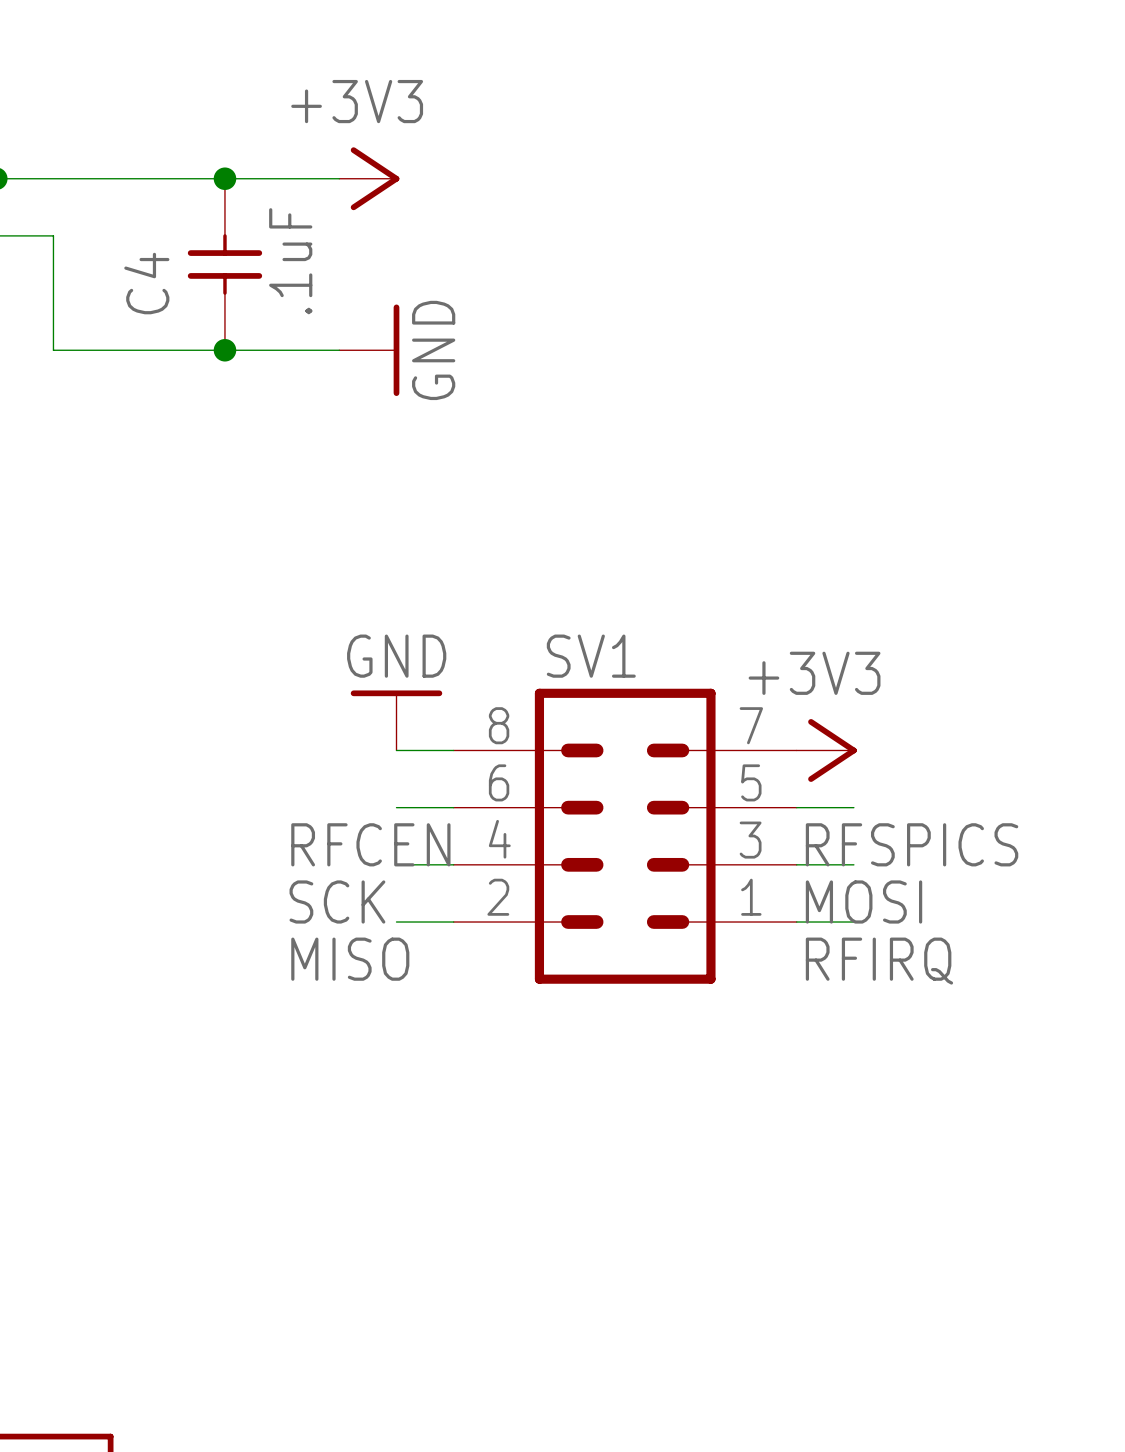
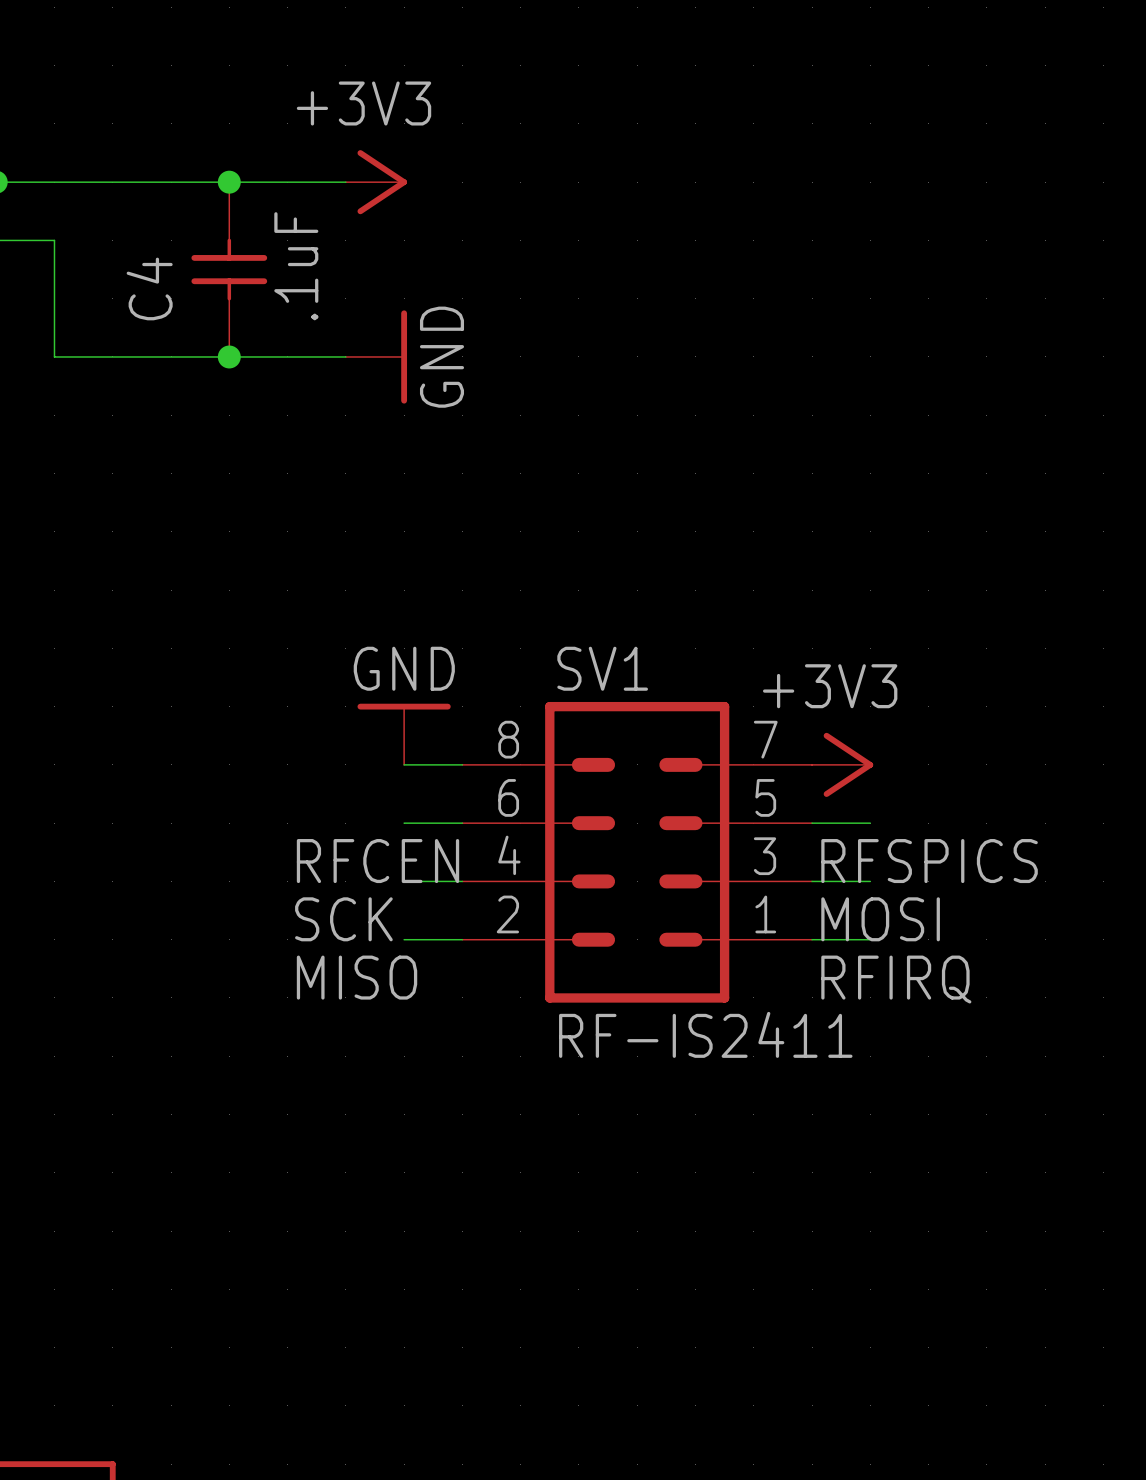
SV1 value: none -> RF-IS2411 (705, 1034)

